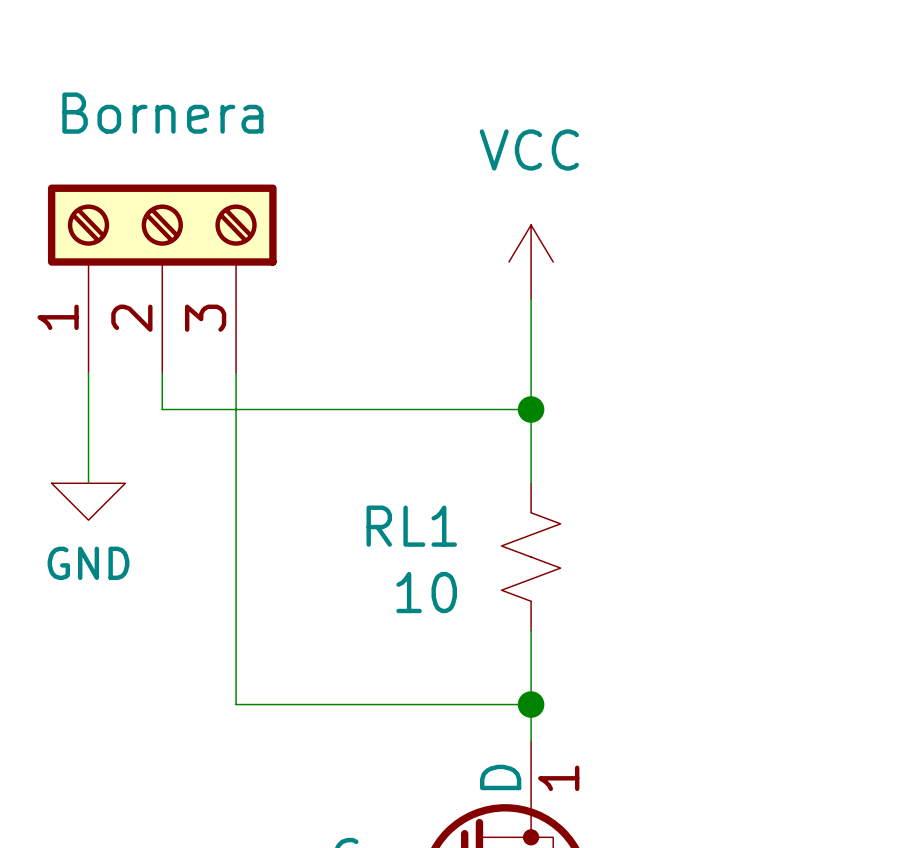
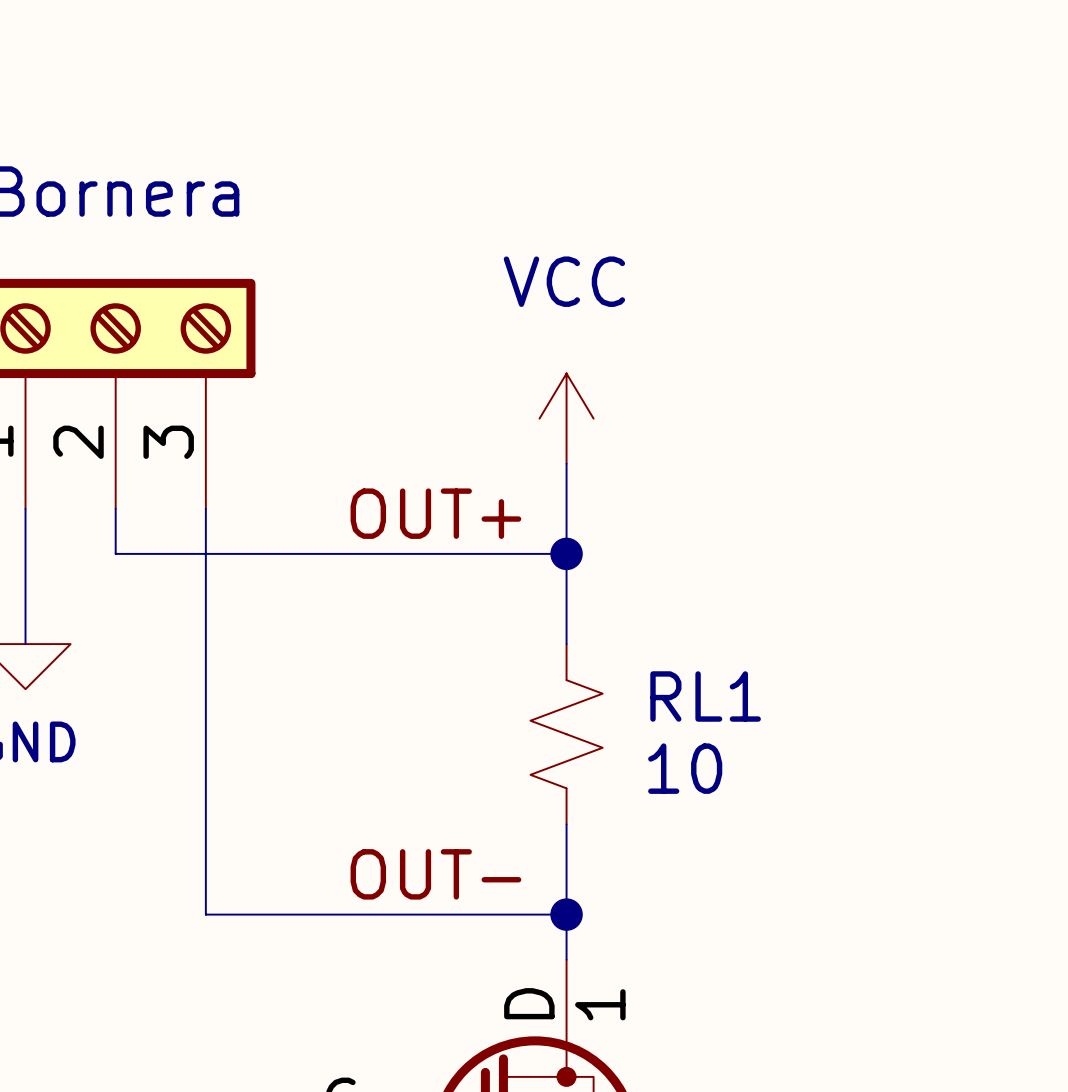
power symbol position: VCC (531, 262) -> VCC (566, 418)
label: none -> OUT+ (435, 513)
RL1 name position: RL1 (411, 526) -> RL1 (705, 696)
RL1 value position: 10 (426, 592) -> 10 (685, 768)
label: none -> OUT- (435, 874)

